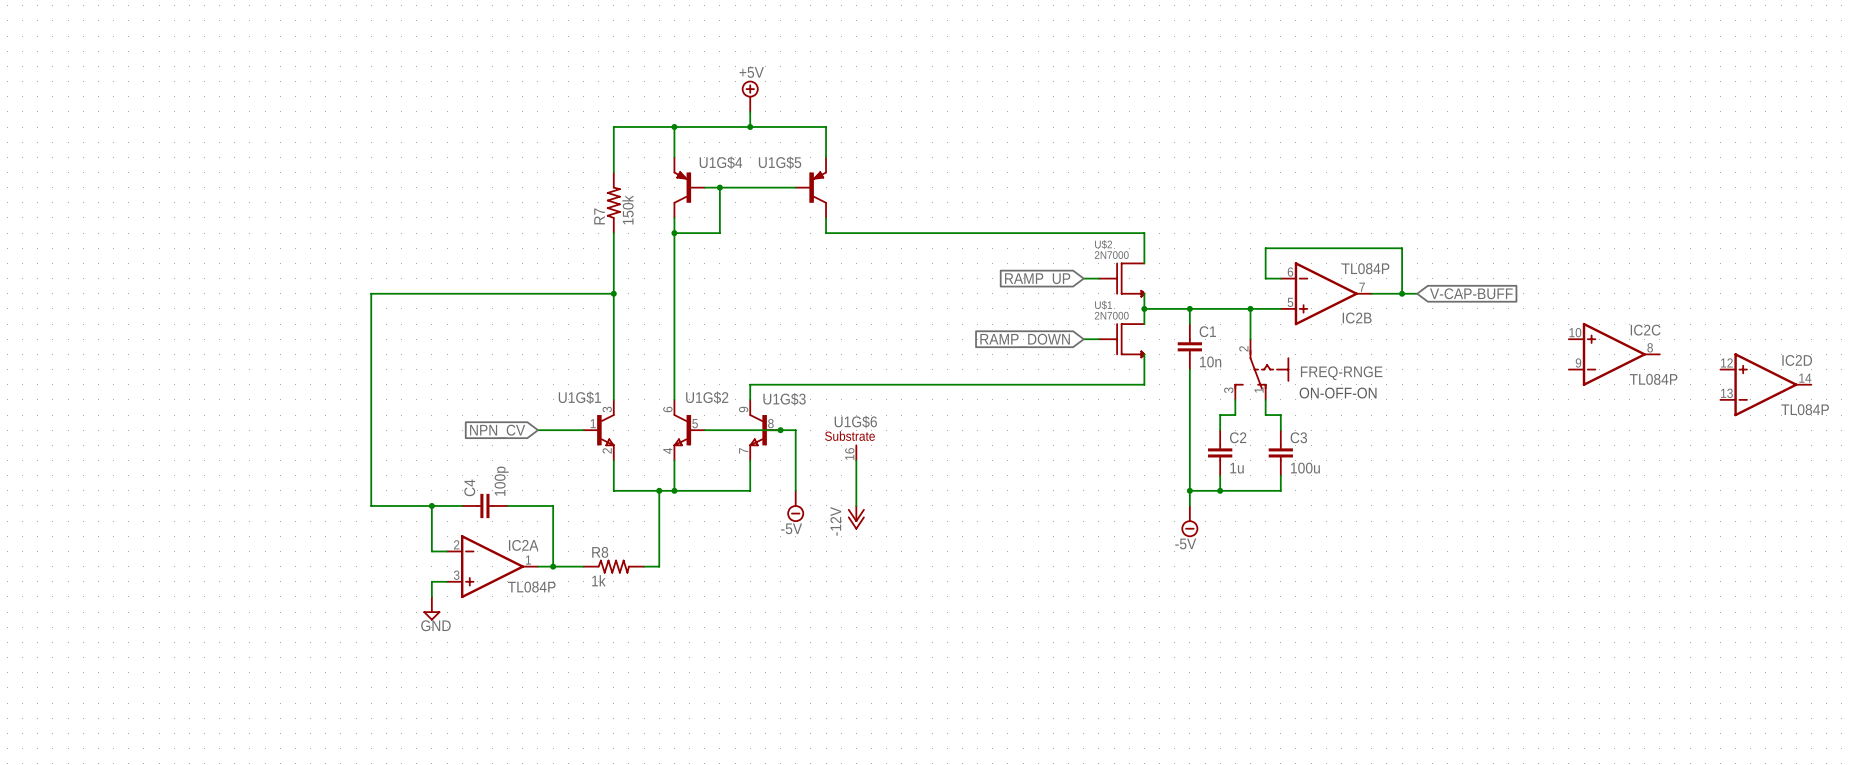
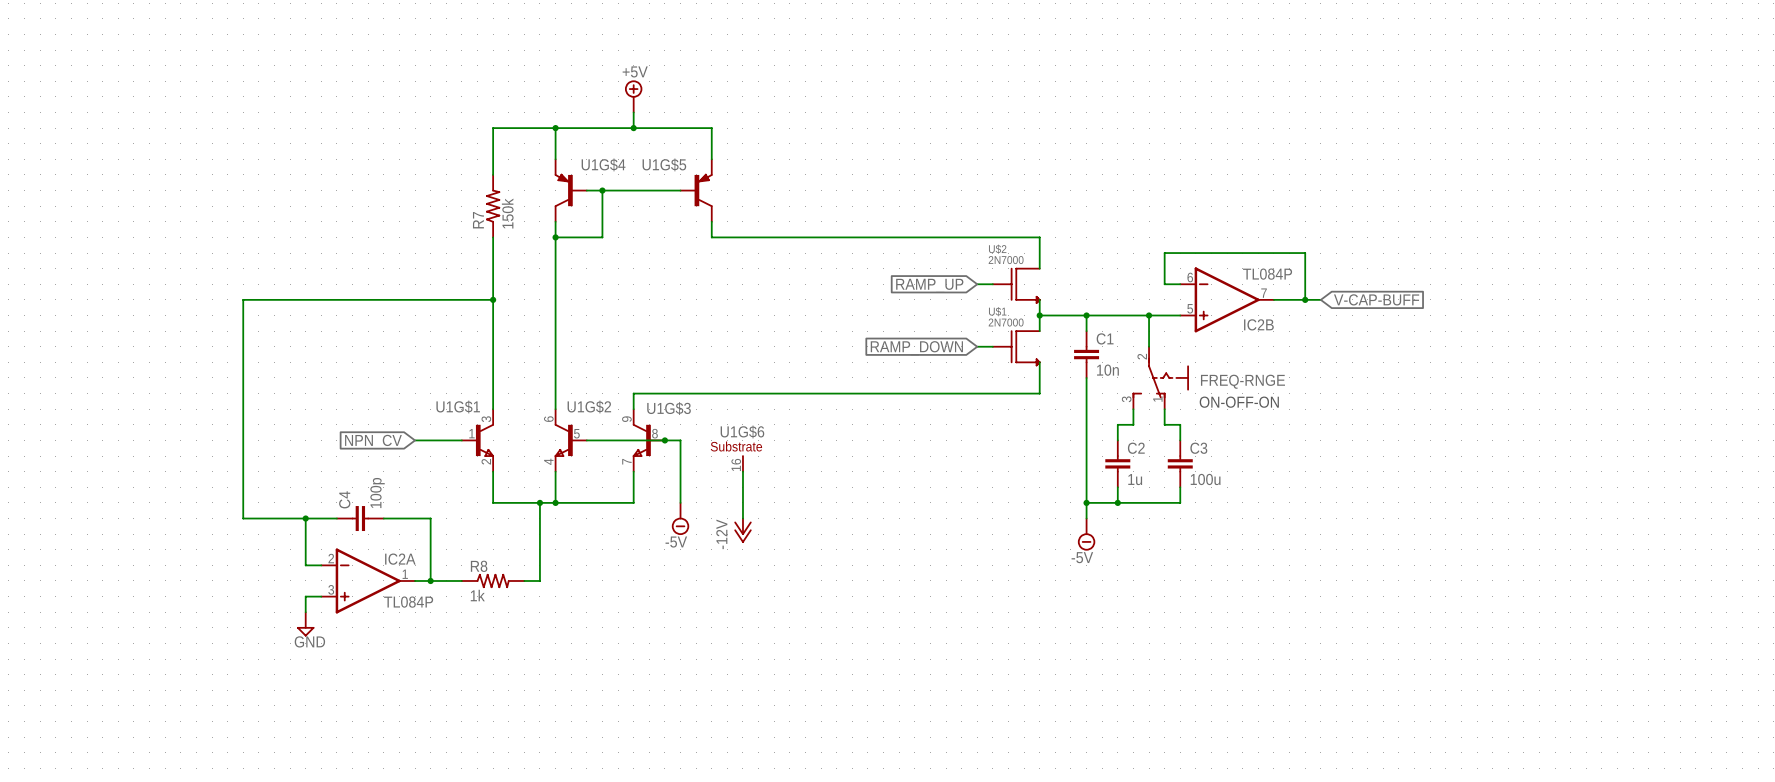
IC2C: TL084P (1614, 354) -> none
IC2D: TL084P (1765, 384) -> none

